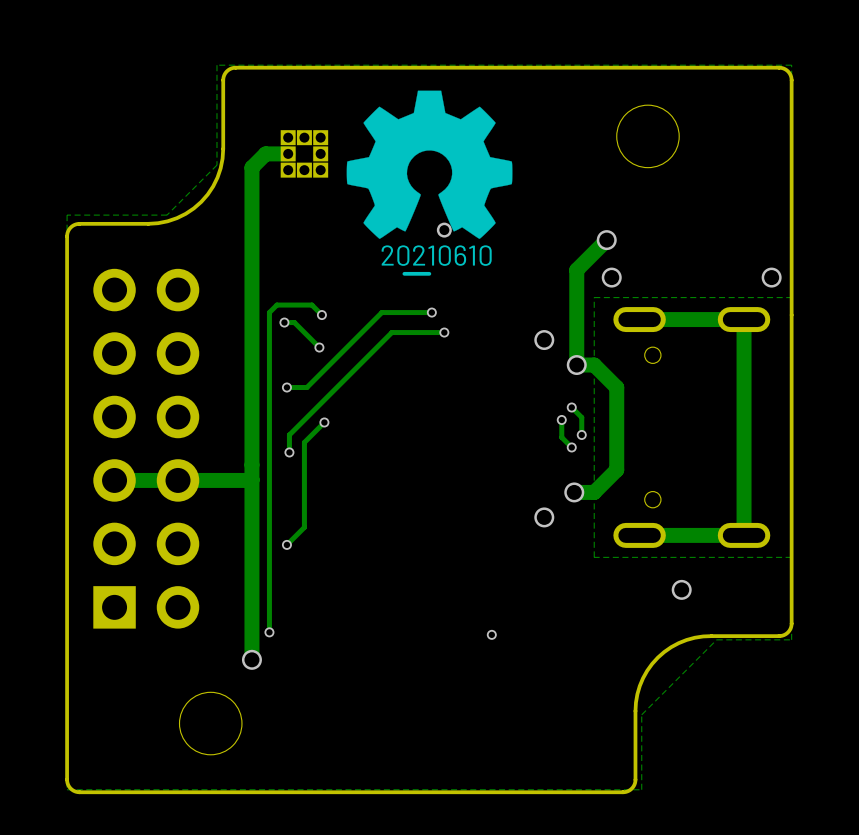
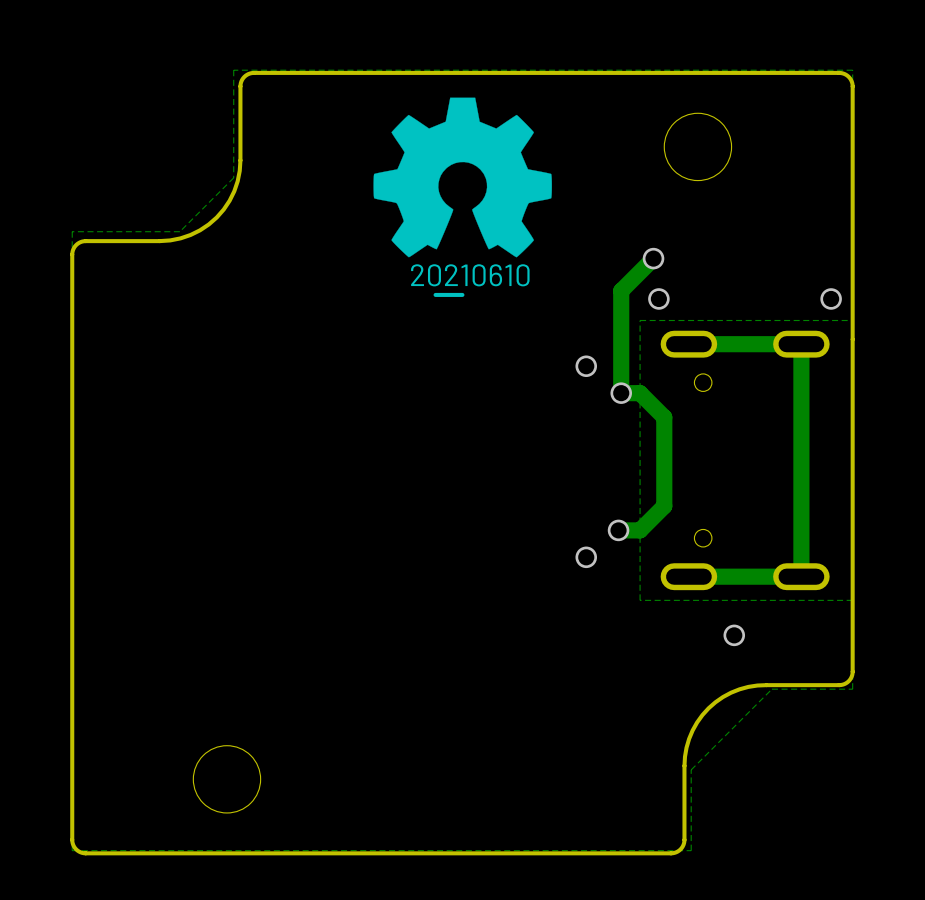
track: (288, 153) (265, 153) (251, 167) (251, 659) -> none
part: (304, 153) -> none
via: (444, 230) -> none
track: (431, 312) (381, 312) (306, 387) (286, 387) -> none
via: (431, 312) -> none
track: (321, 315) (311, 305) (276, 305) (269, 312) (269, 632) -> none
via: (321, 315) -> none
track: (284, 322) (294, 322) (319, 347) -> none
via: (284, 322) -> none
track: (444, 332) (391, 332) (289, 434) (289, 452) -> none
via: (444, 332) -> none
via: (319, 347) -> none
via: (286, 387) -> none
track: (571, 407) (581, 417) (581, 434) -> none
via: (571, 407) -> none
track: (561, 419) (561, 437) (571, 447) -> none
via: (561, 419) -> none
track: (324, 422) (304, 442) (304, 527) (286, 544) -> none
via: (324, 422) -> none
via: (581, 434) -> none
via: (571, 447) -> none
part: (146, 448) -> none
via: (289, 452) -> none
track: (251, 479) (102, 480) -> none
via: (286, 544) -> none
via: (269, 632) -> none
via: (491, 634) -> none
via: (251, 659) -> none

